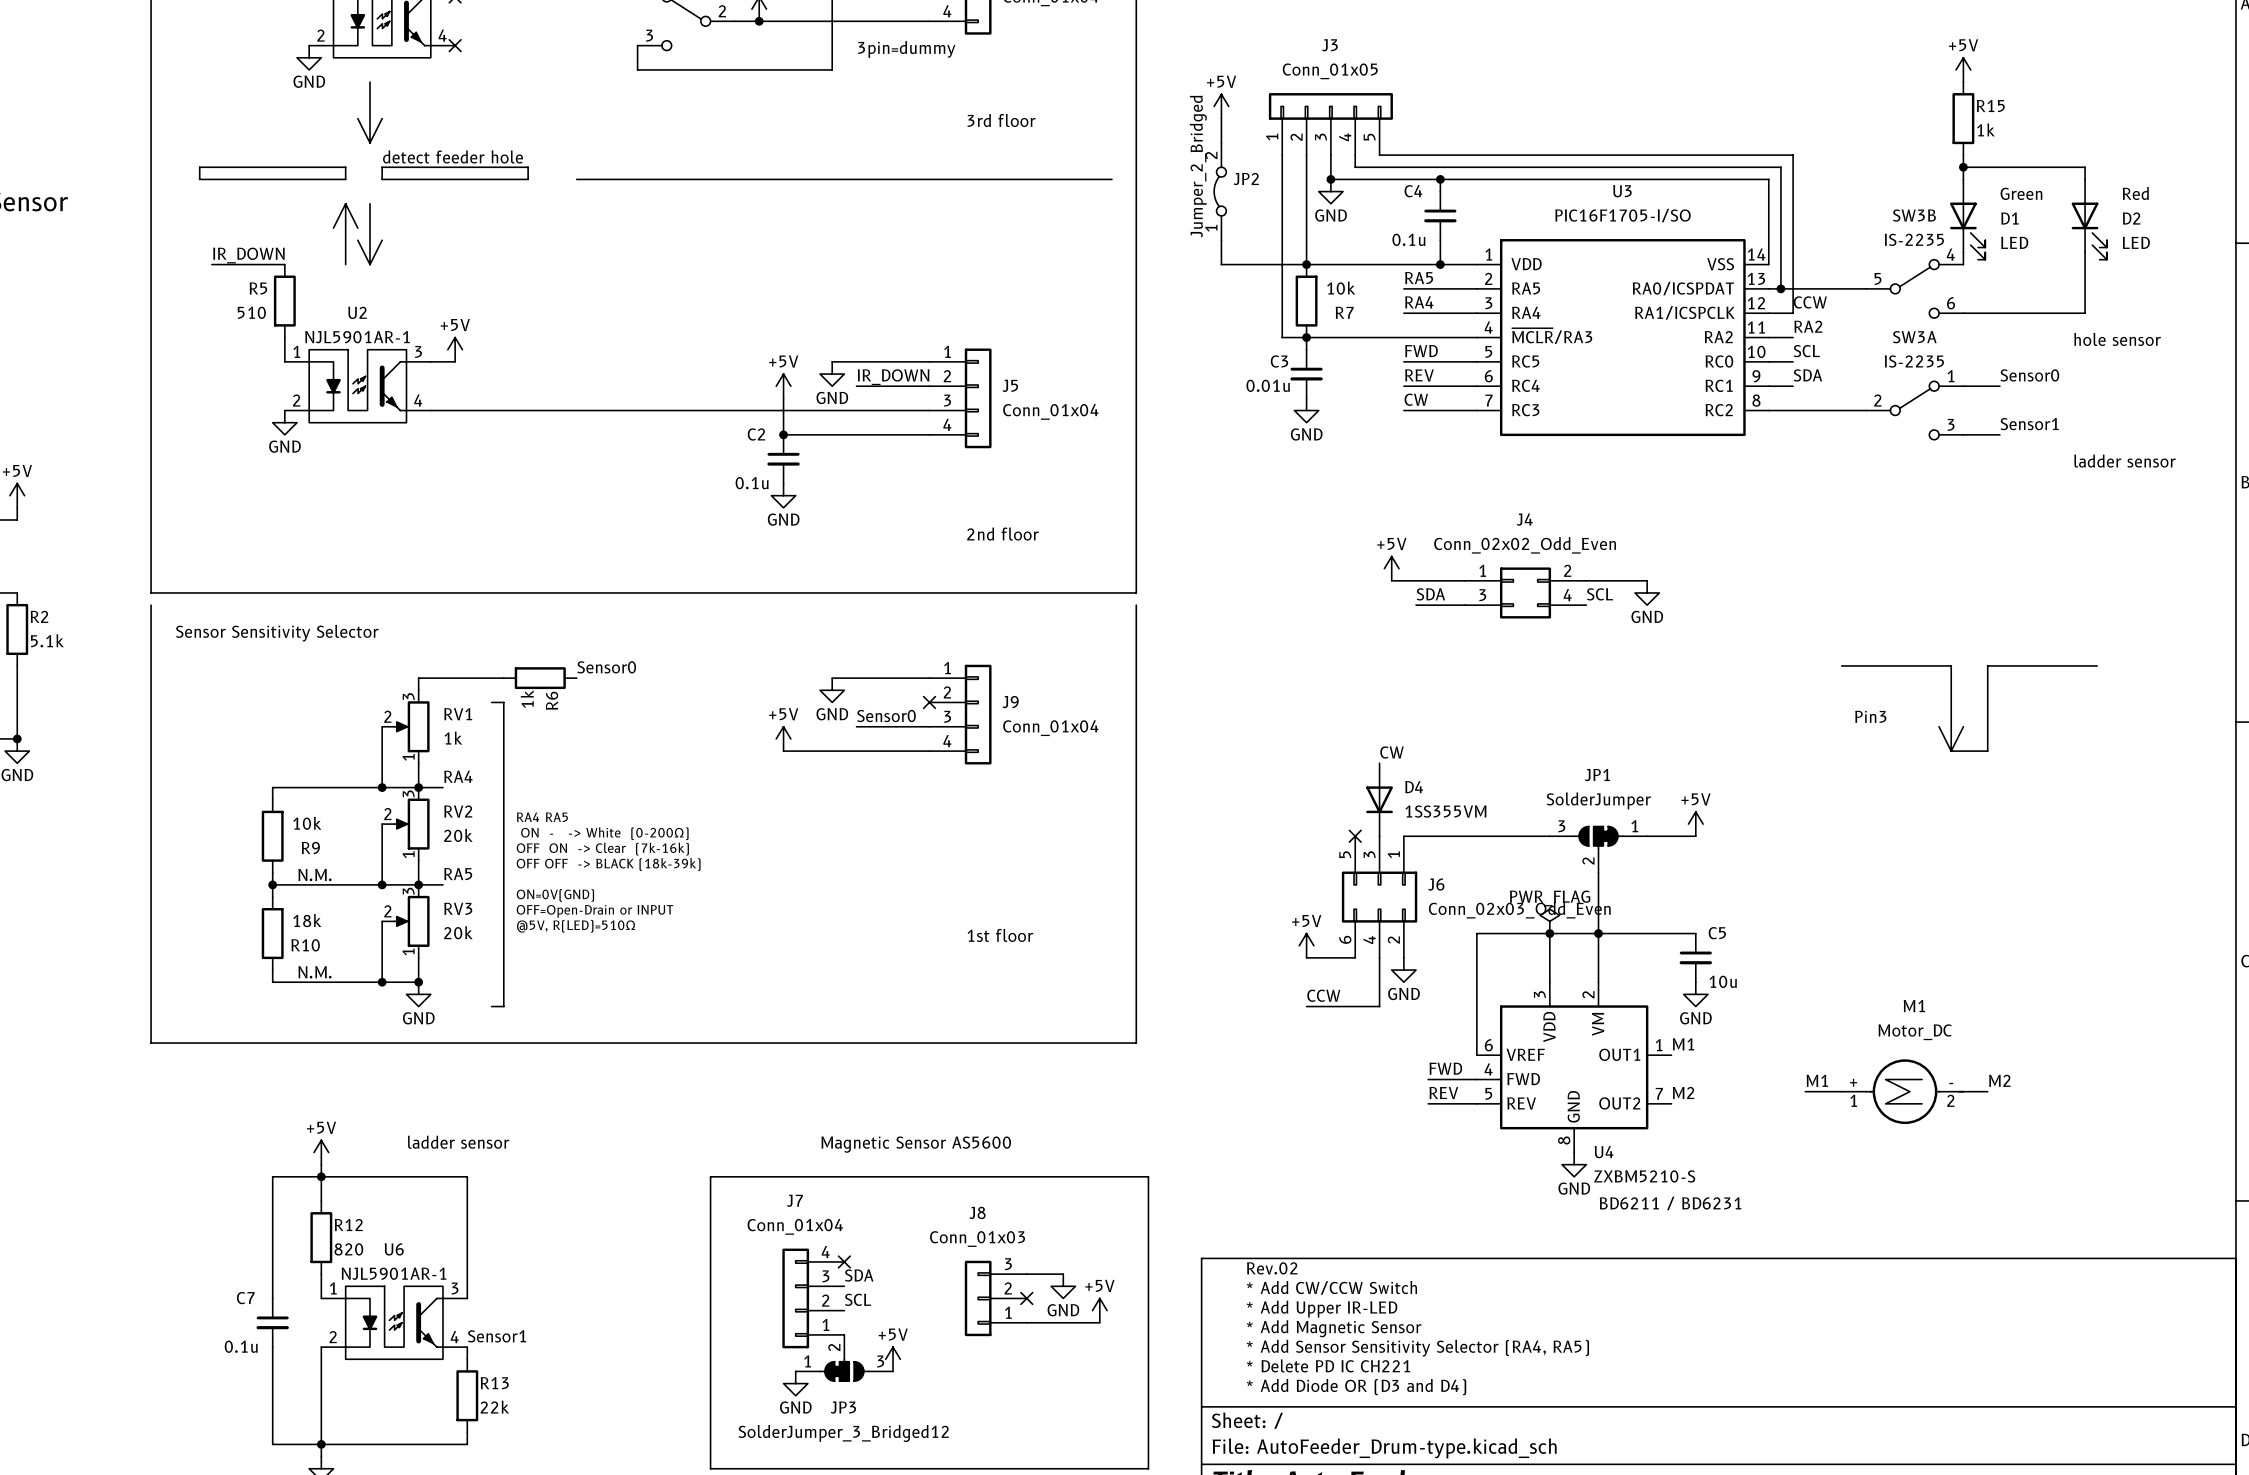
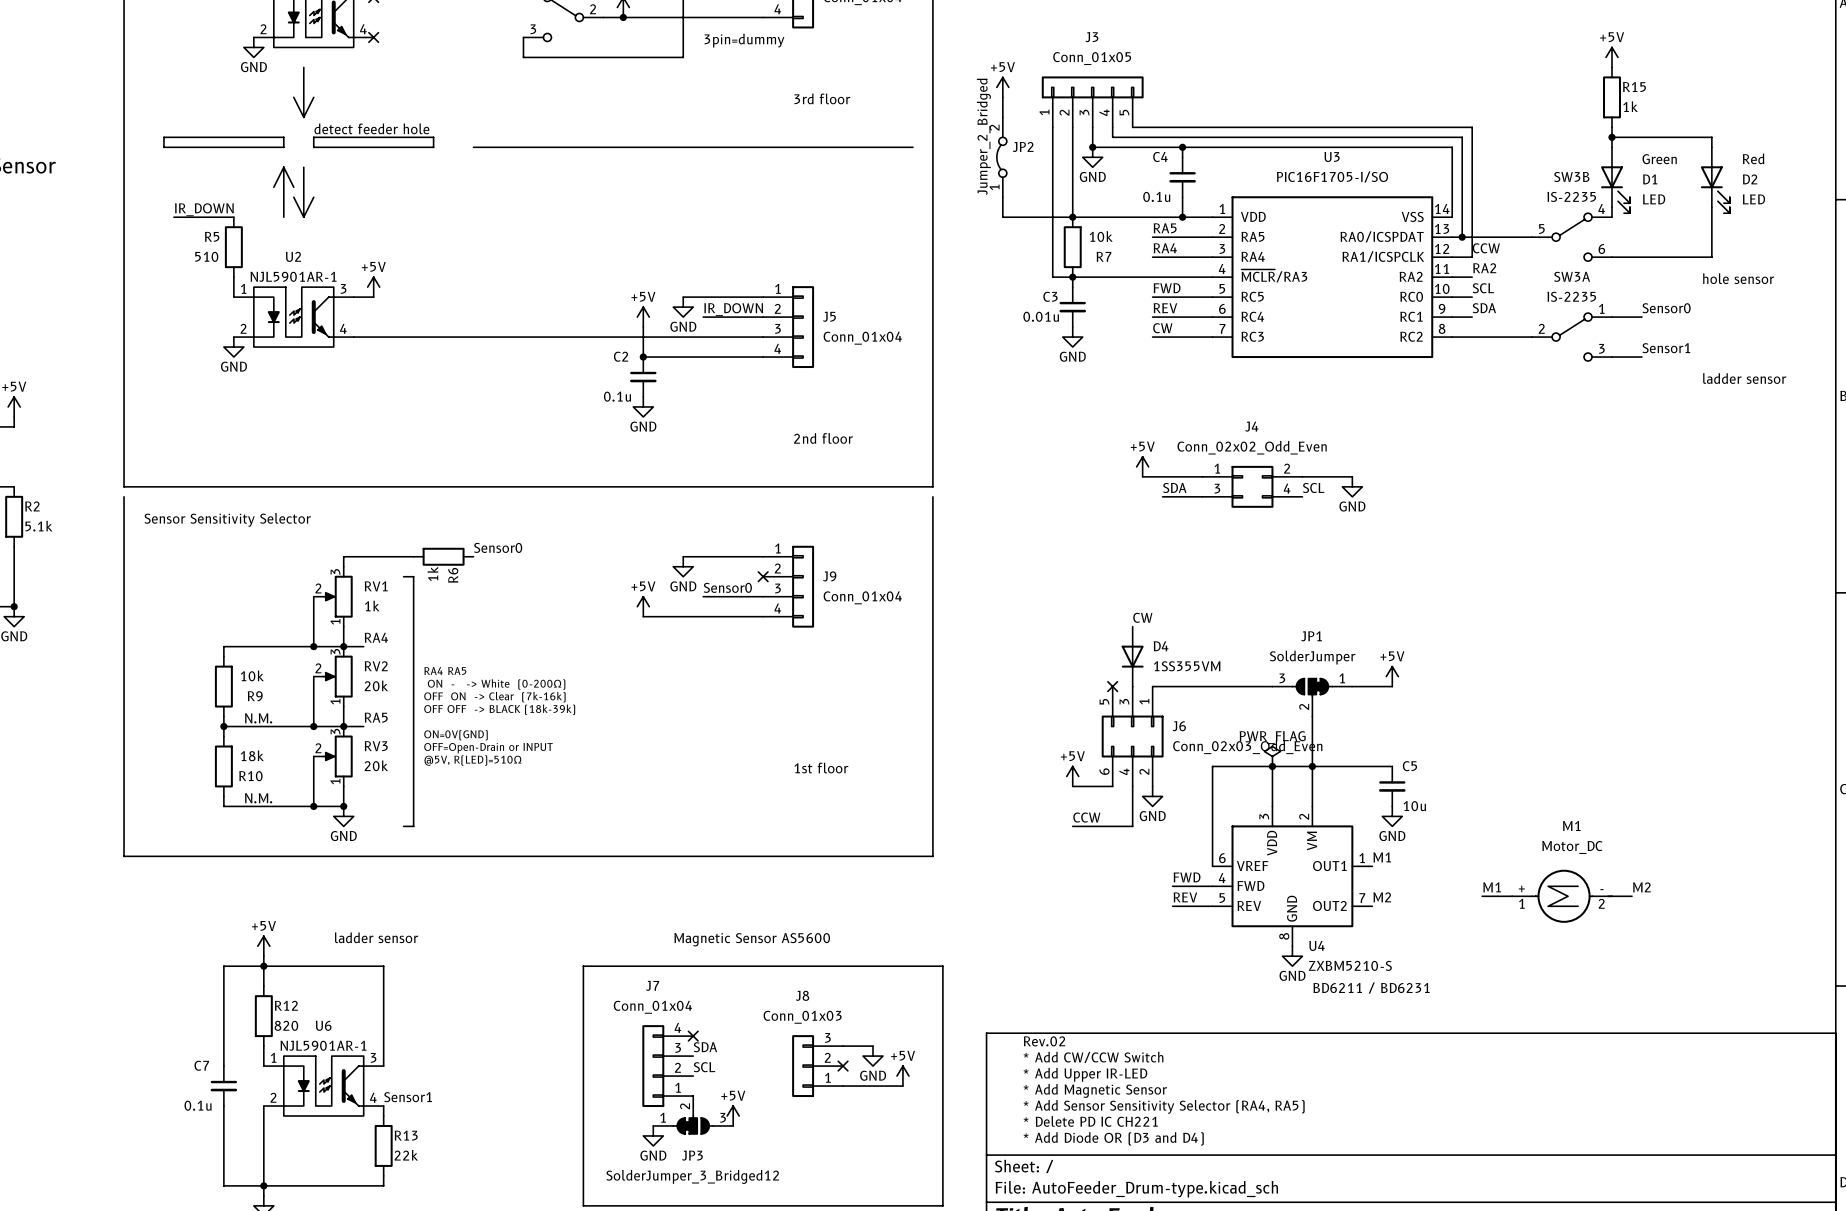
line: (1841, 665) (1951, 665) (1951, 751) -> none
line: (2097, 665) (1987, 665) (1987, 751) (1951, 751) -> none
text: Pin3 (1870, 716) -> none
line: (1939, 726) (1951, 751) -> none
line: (1963, 726) (1951, 751) -> none

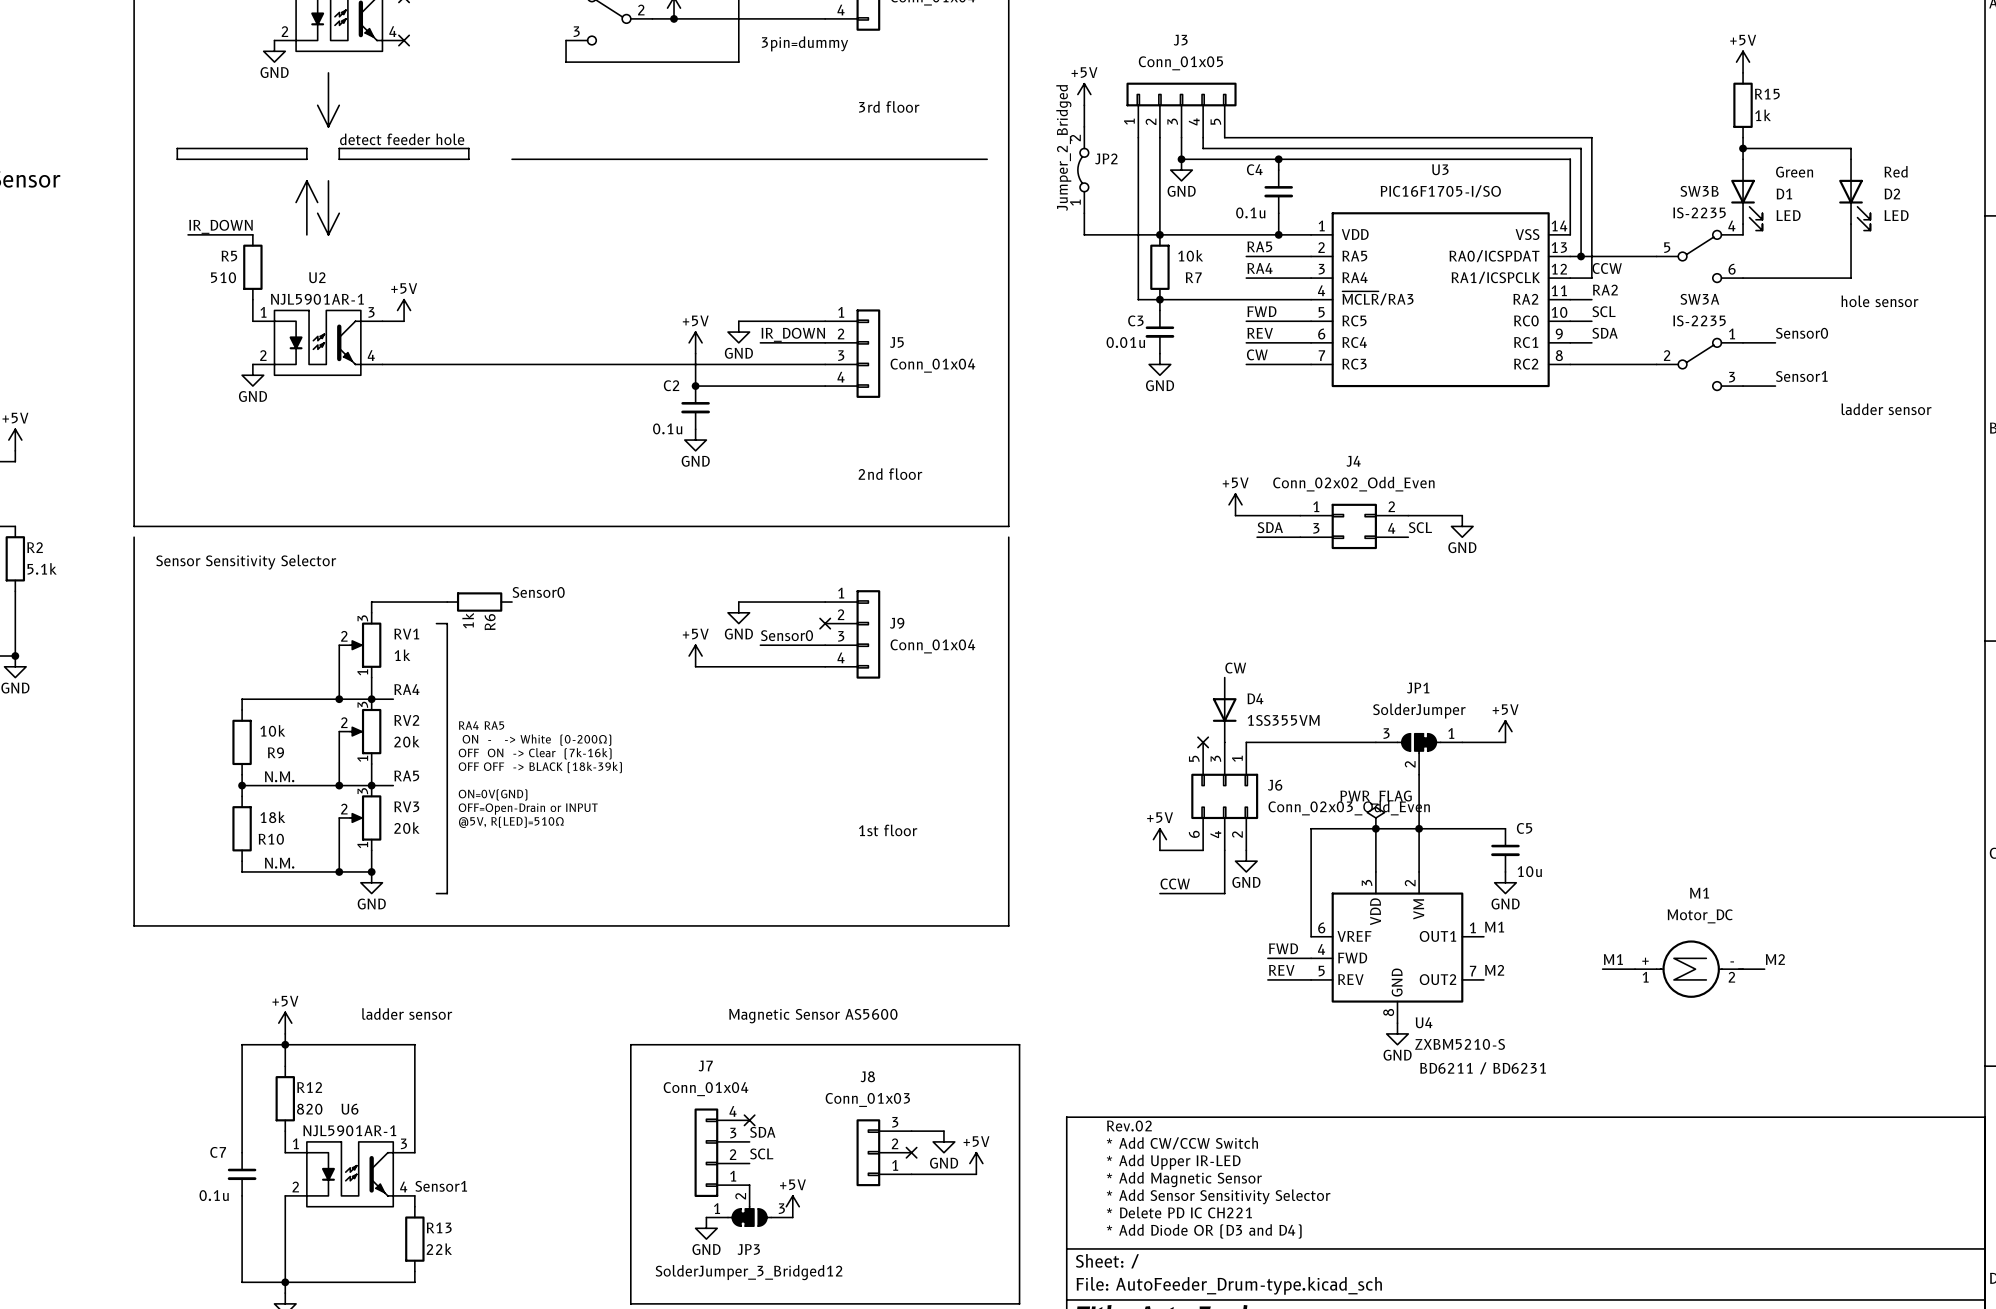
text: * Add Sensor Sensitivity Selector (RA4, RA5) (1164, 1106) -> * Add Sensor Sensitivity Selector (1218, 1196)

